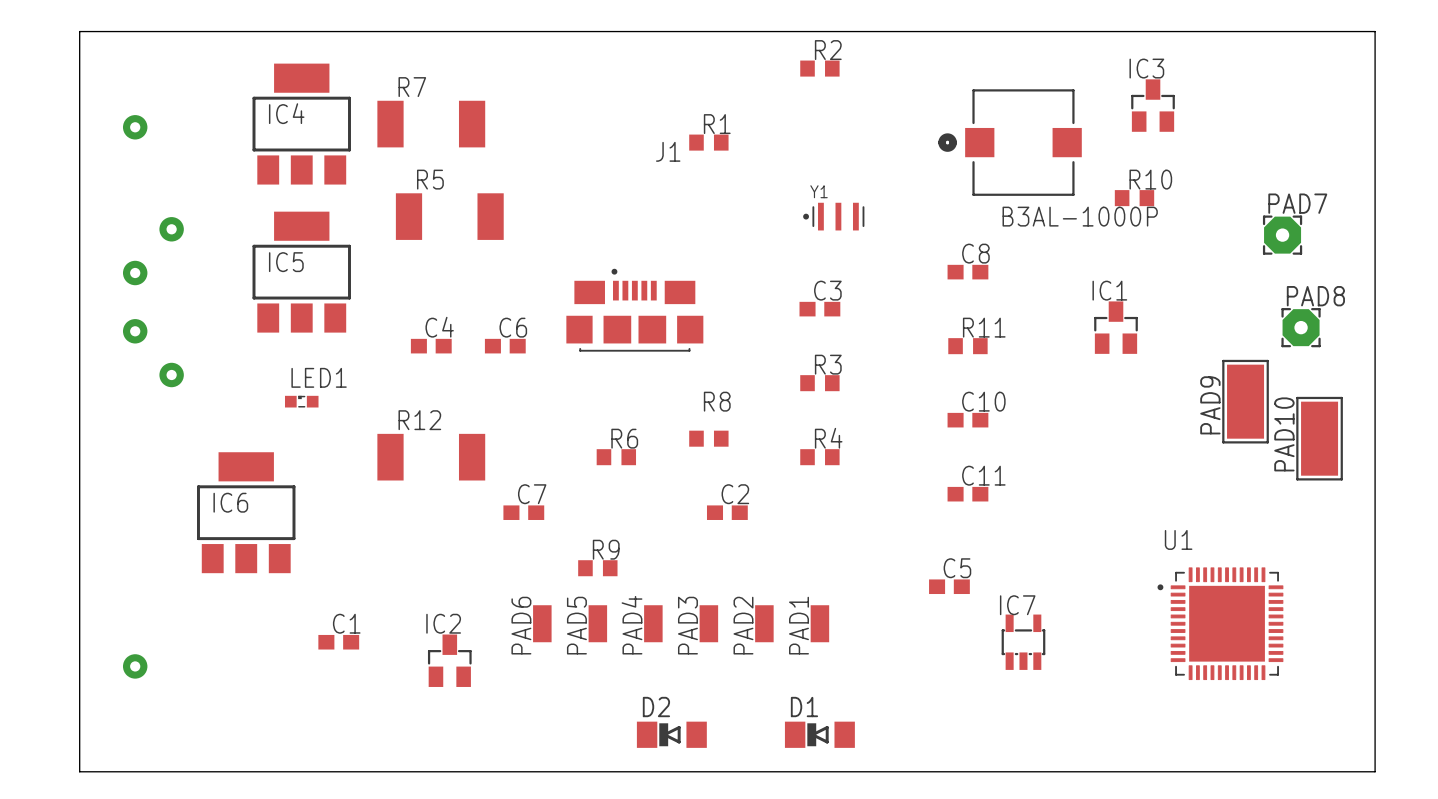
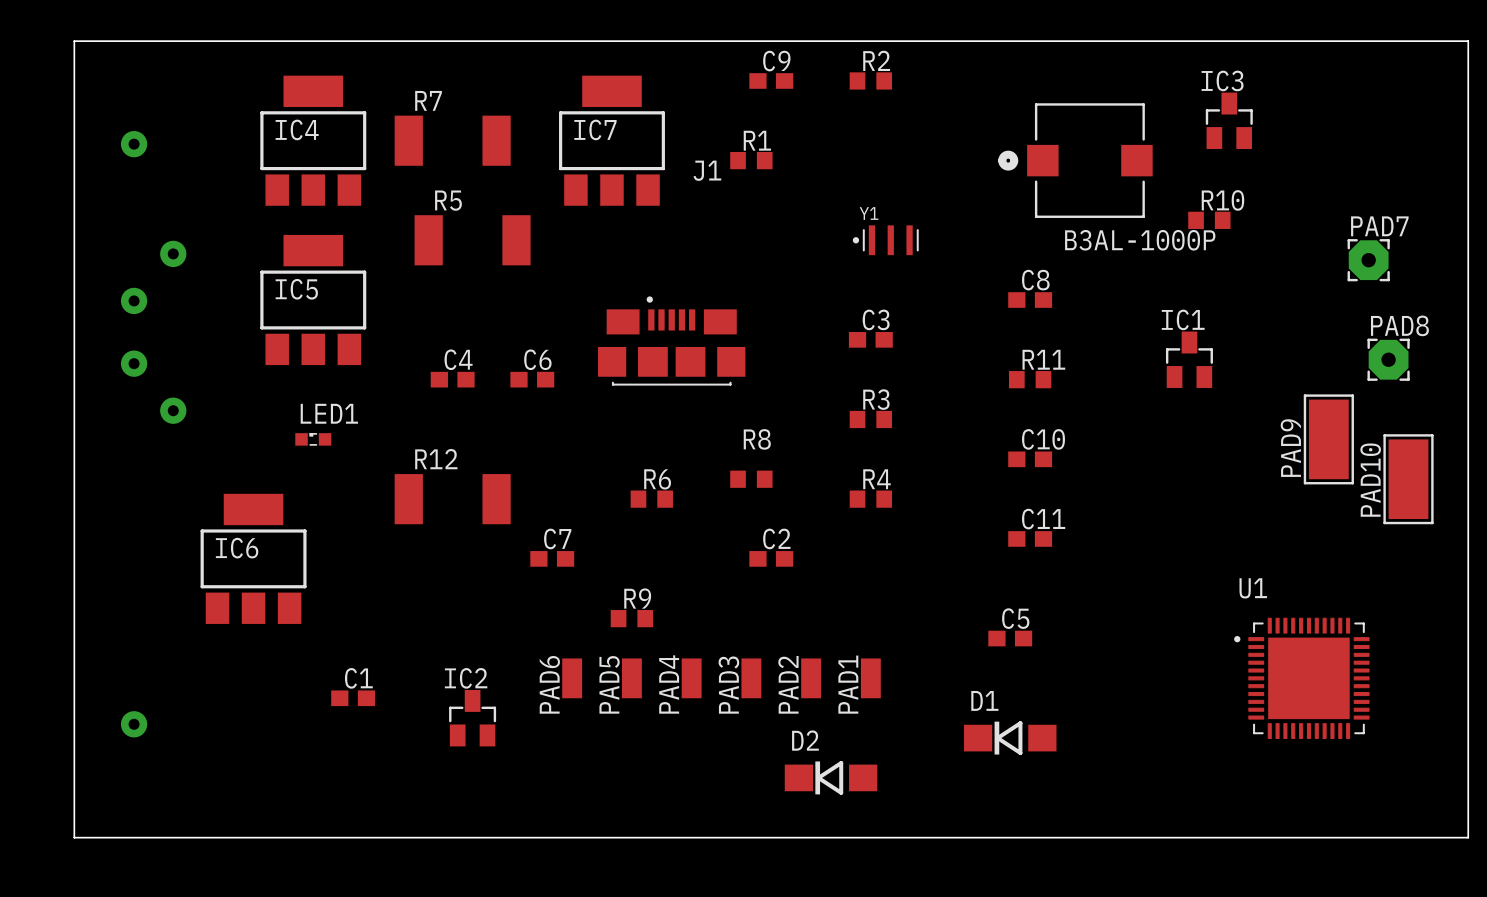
C9: none -> (771, 80)
IC7 footprint: [1001, 614, 1046, 670] -> [559, 75, 665, 206]
D2 footprint: [636, 721, 707, 748] -> [784, 761, 878, 795]
D1 footprint: [784, 721, 855, 748] -> [963, 721, 1057, 755]

